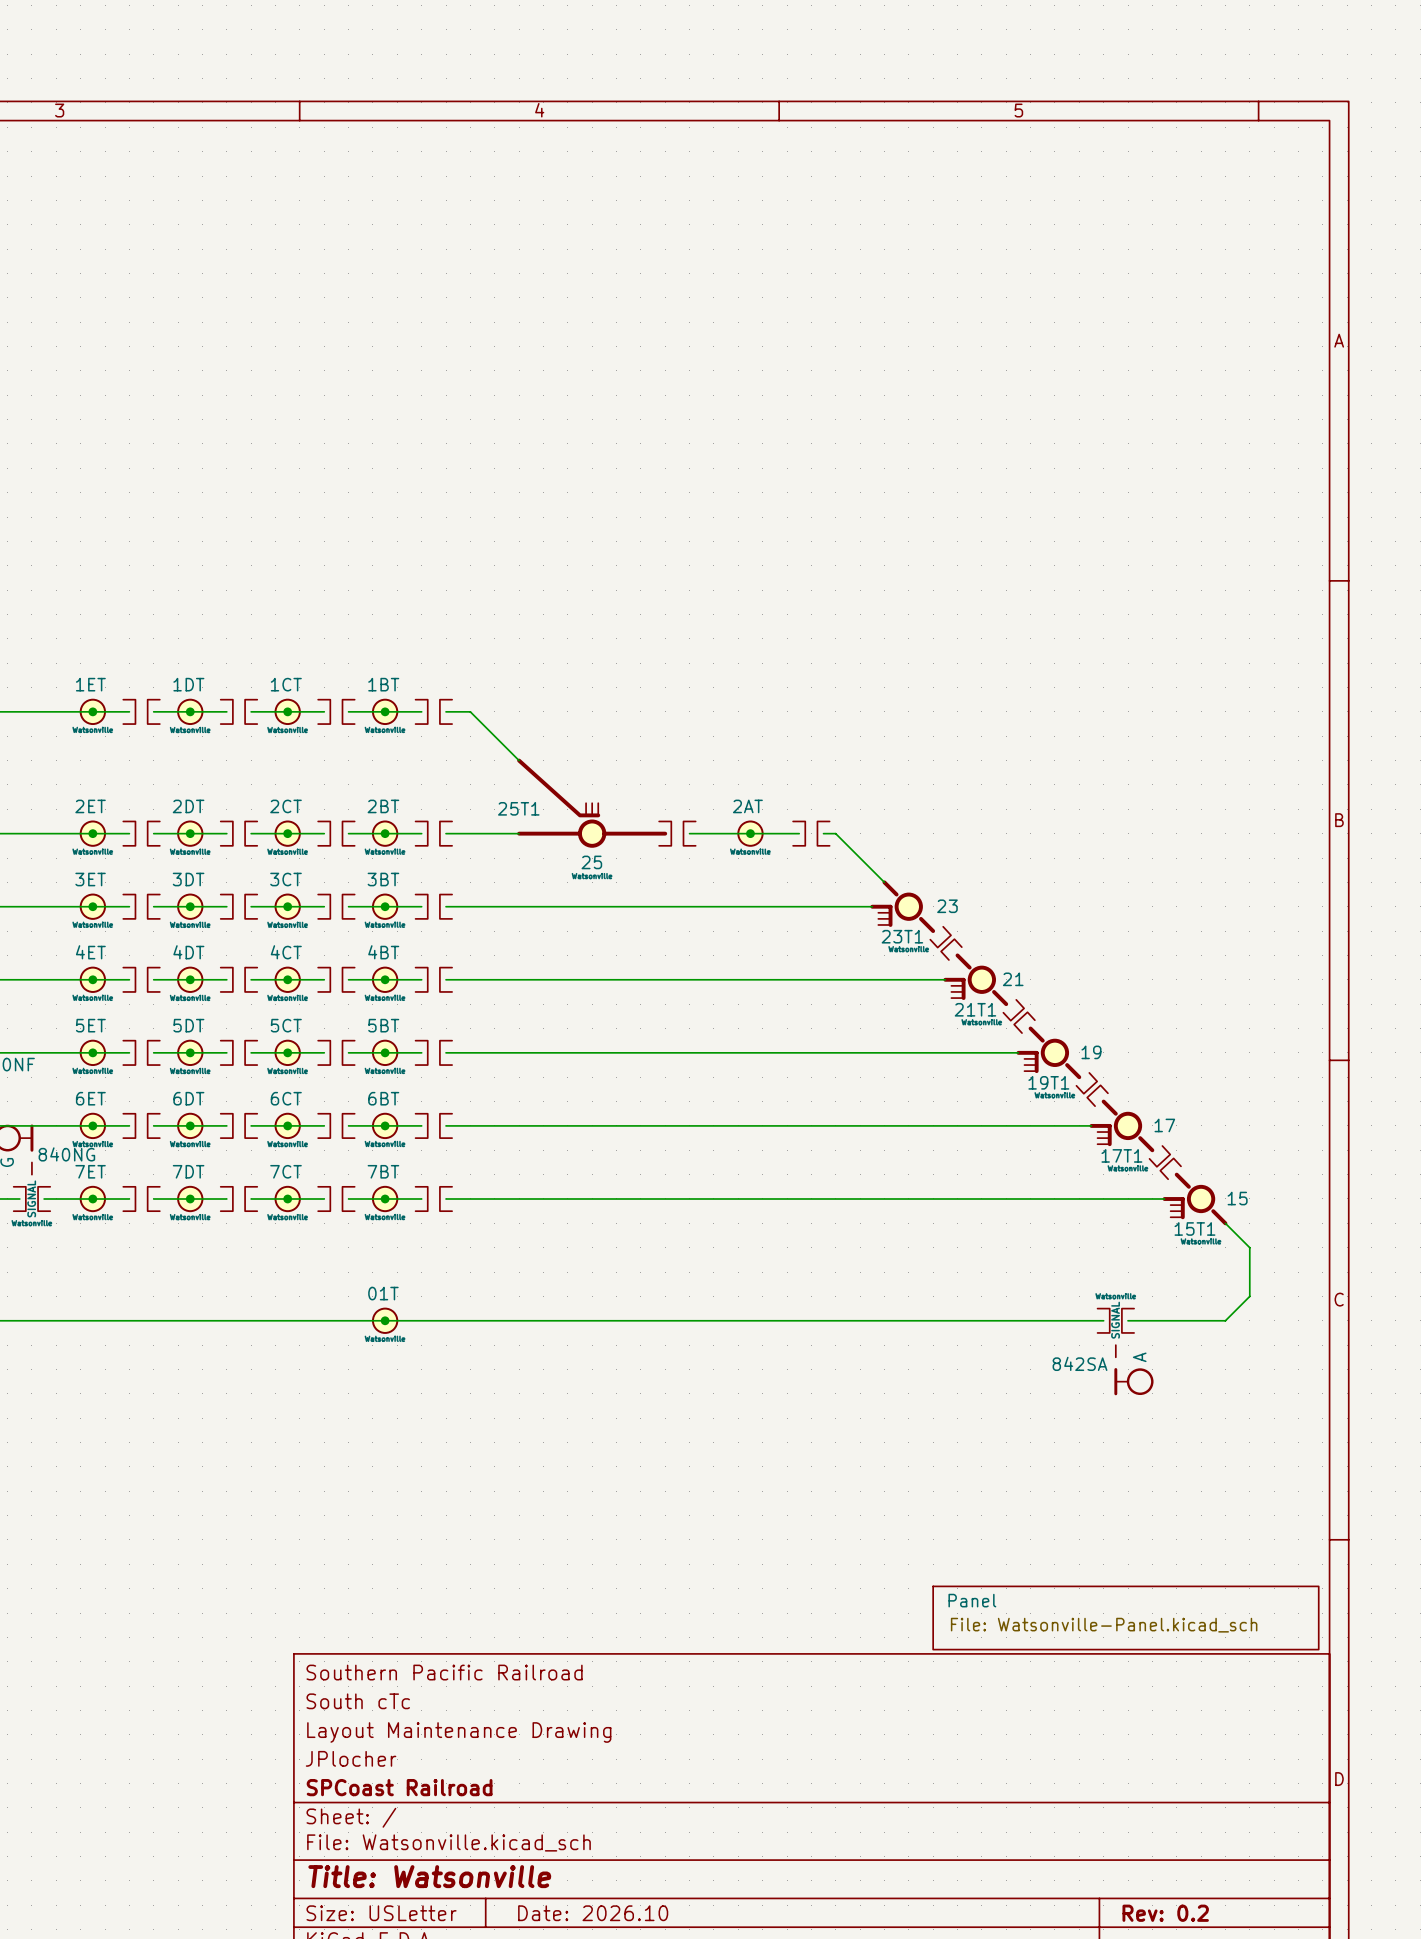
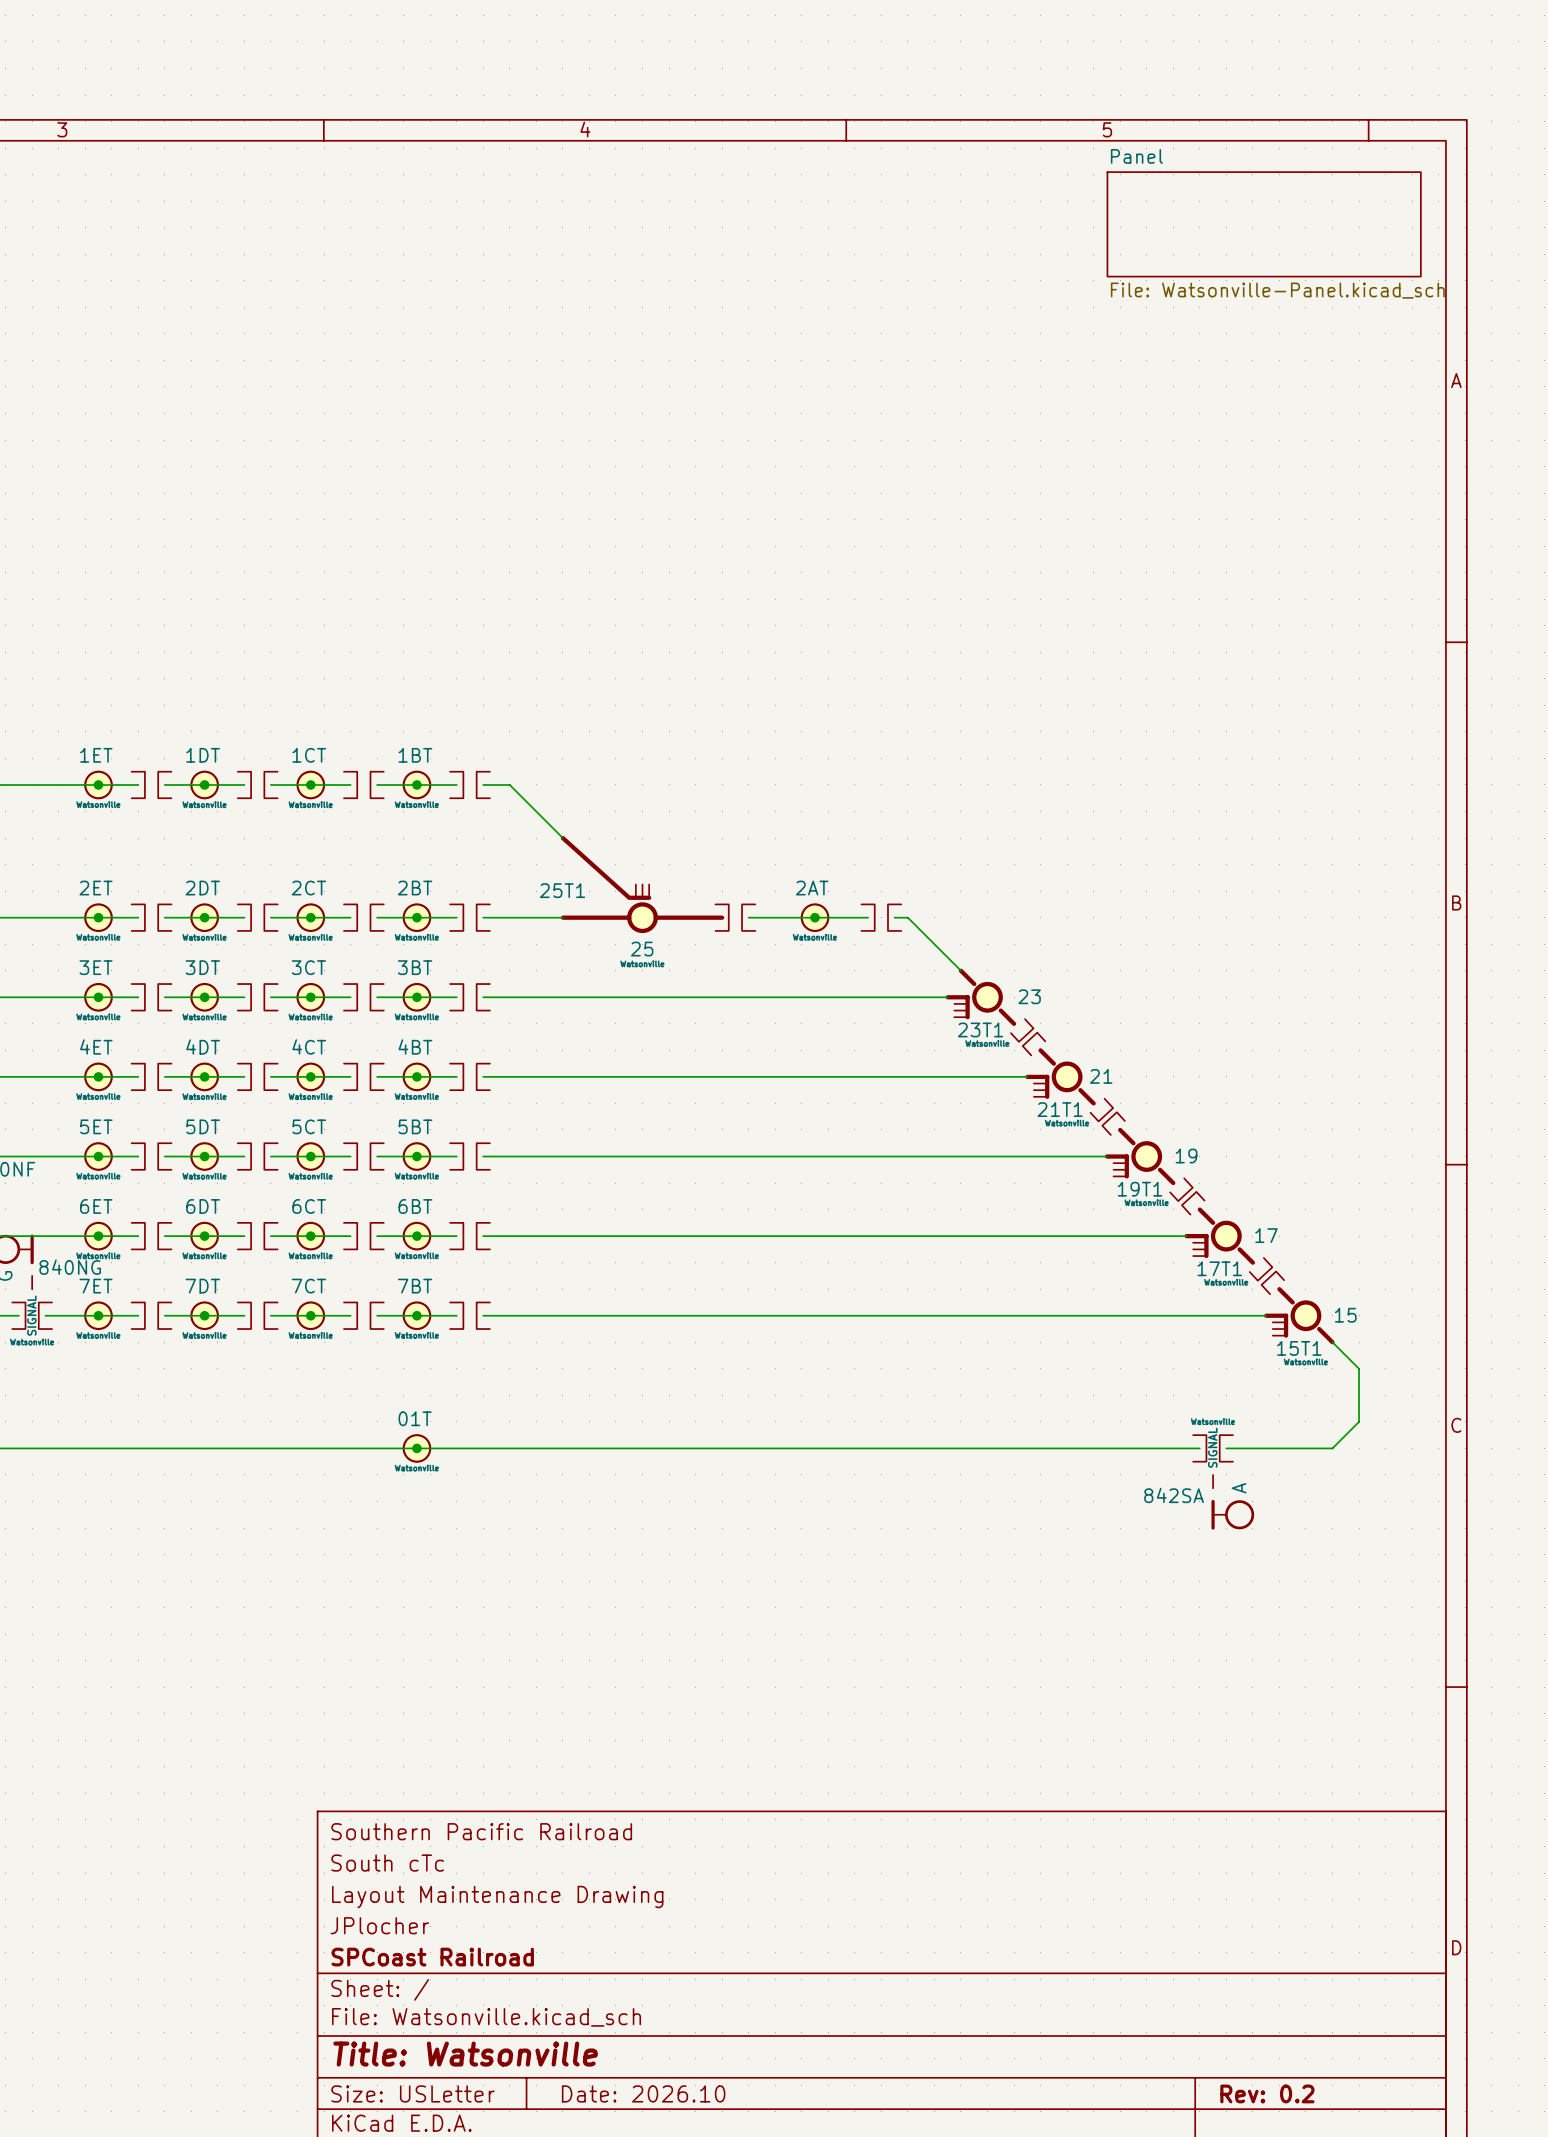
sheet Panel: none -> File: Watsonville-Panel.kicad_sch (1264, 224)
sheet Panel: File: Watsonville-Panel.kicad_sch (1125, 1618) -> none

